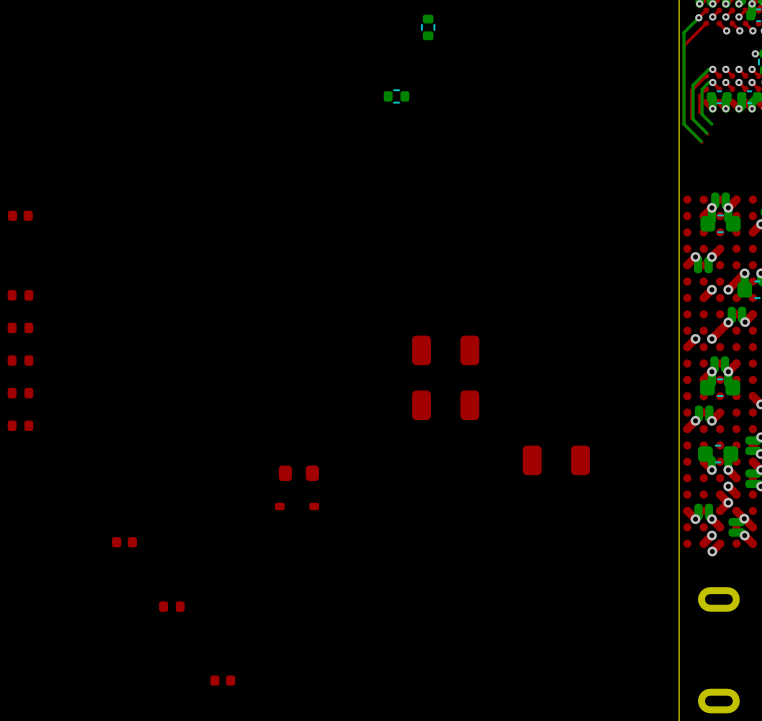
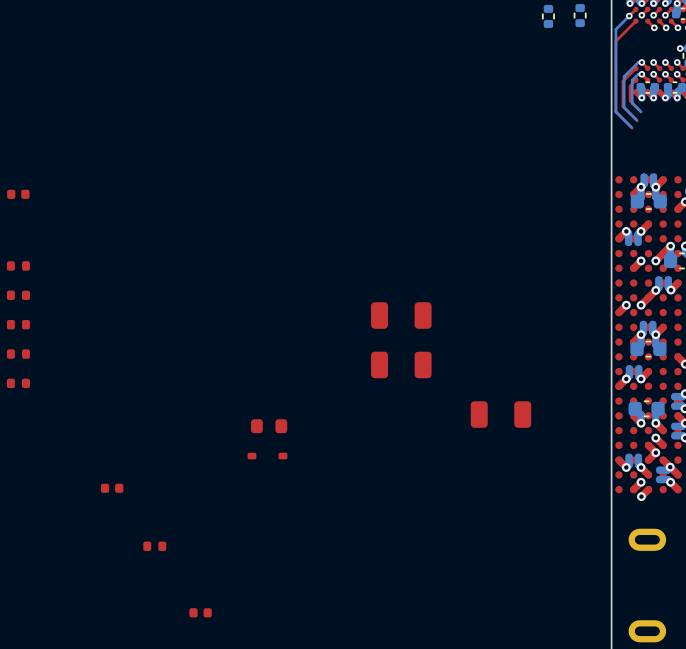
part: none -> (580, 15)
part: none -> (548, 16)
part: (428, 27) -> none
part: (396, 96) -> none

